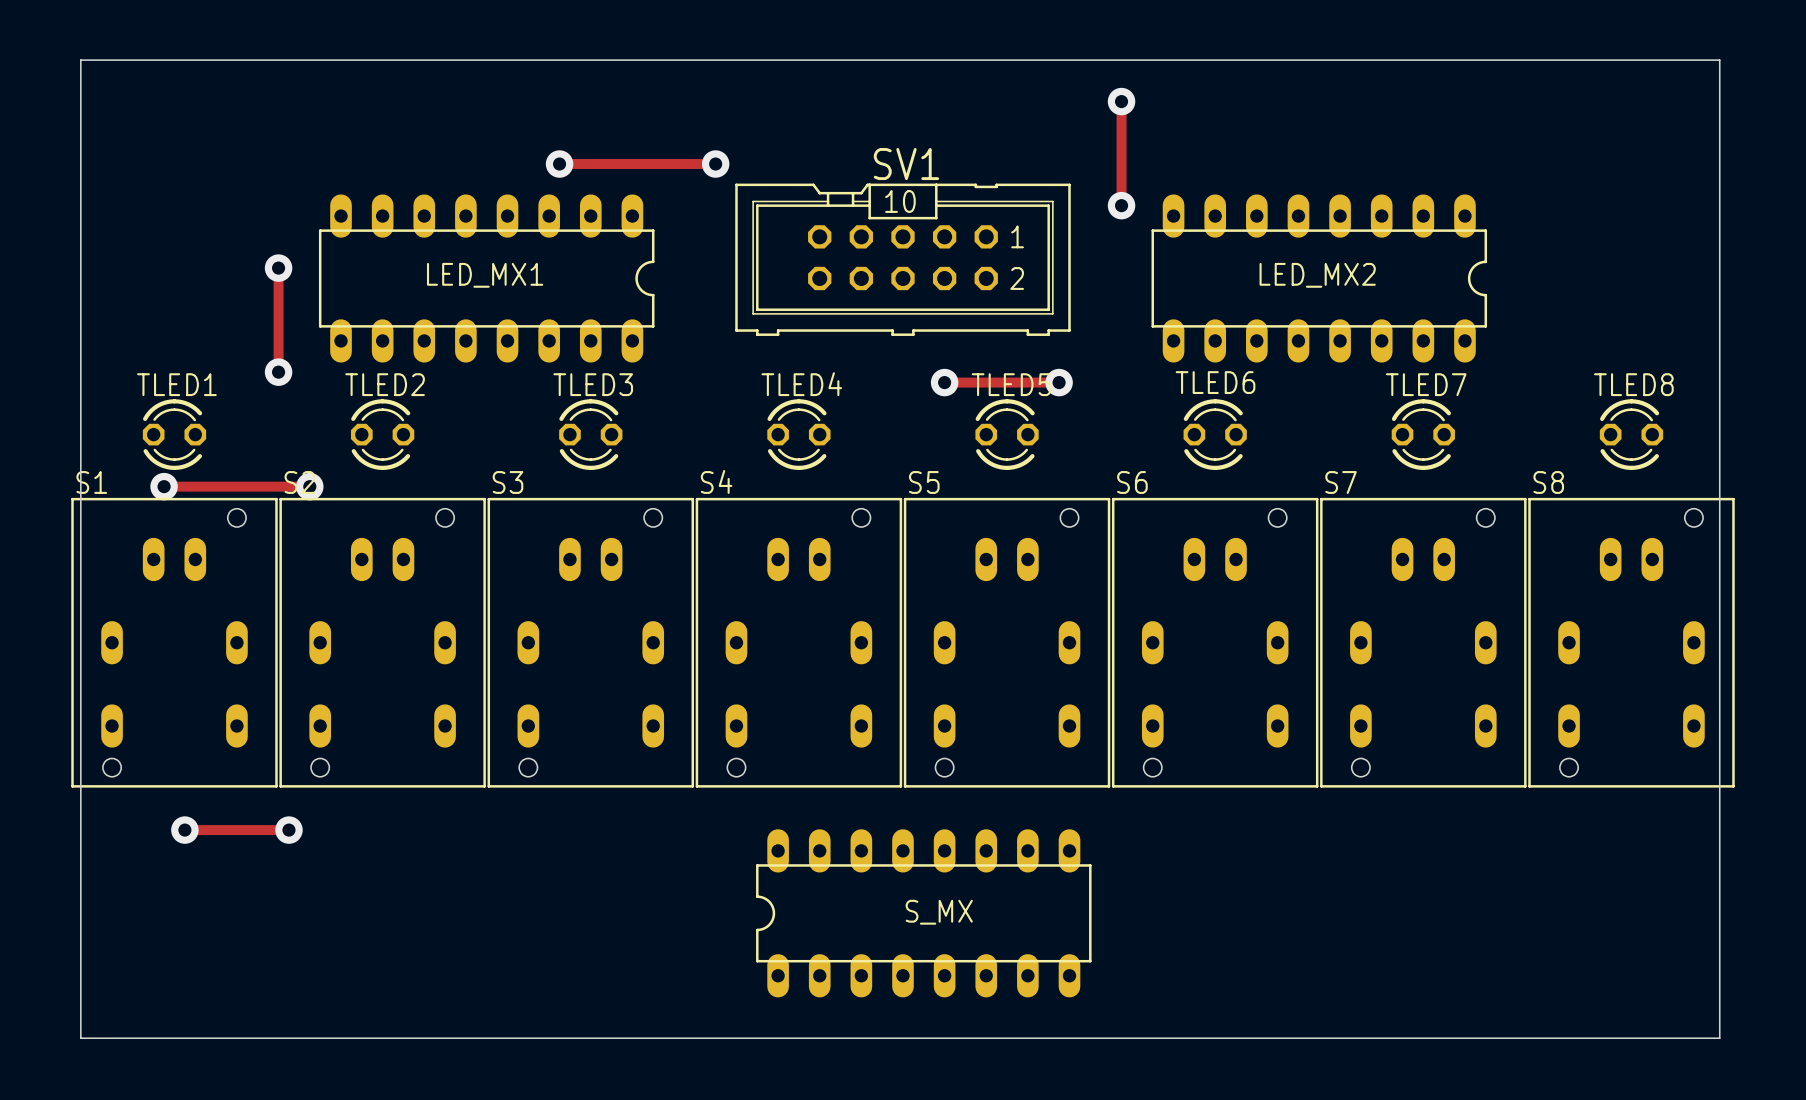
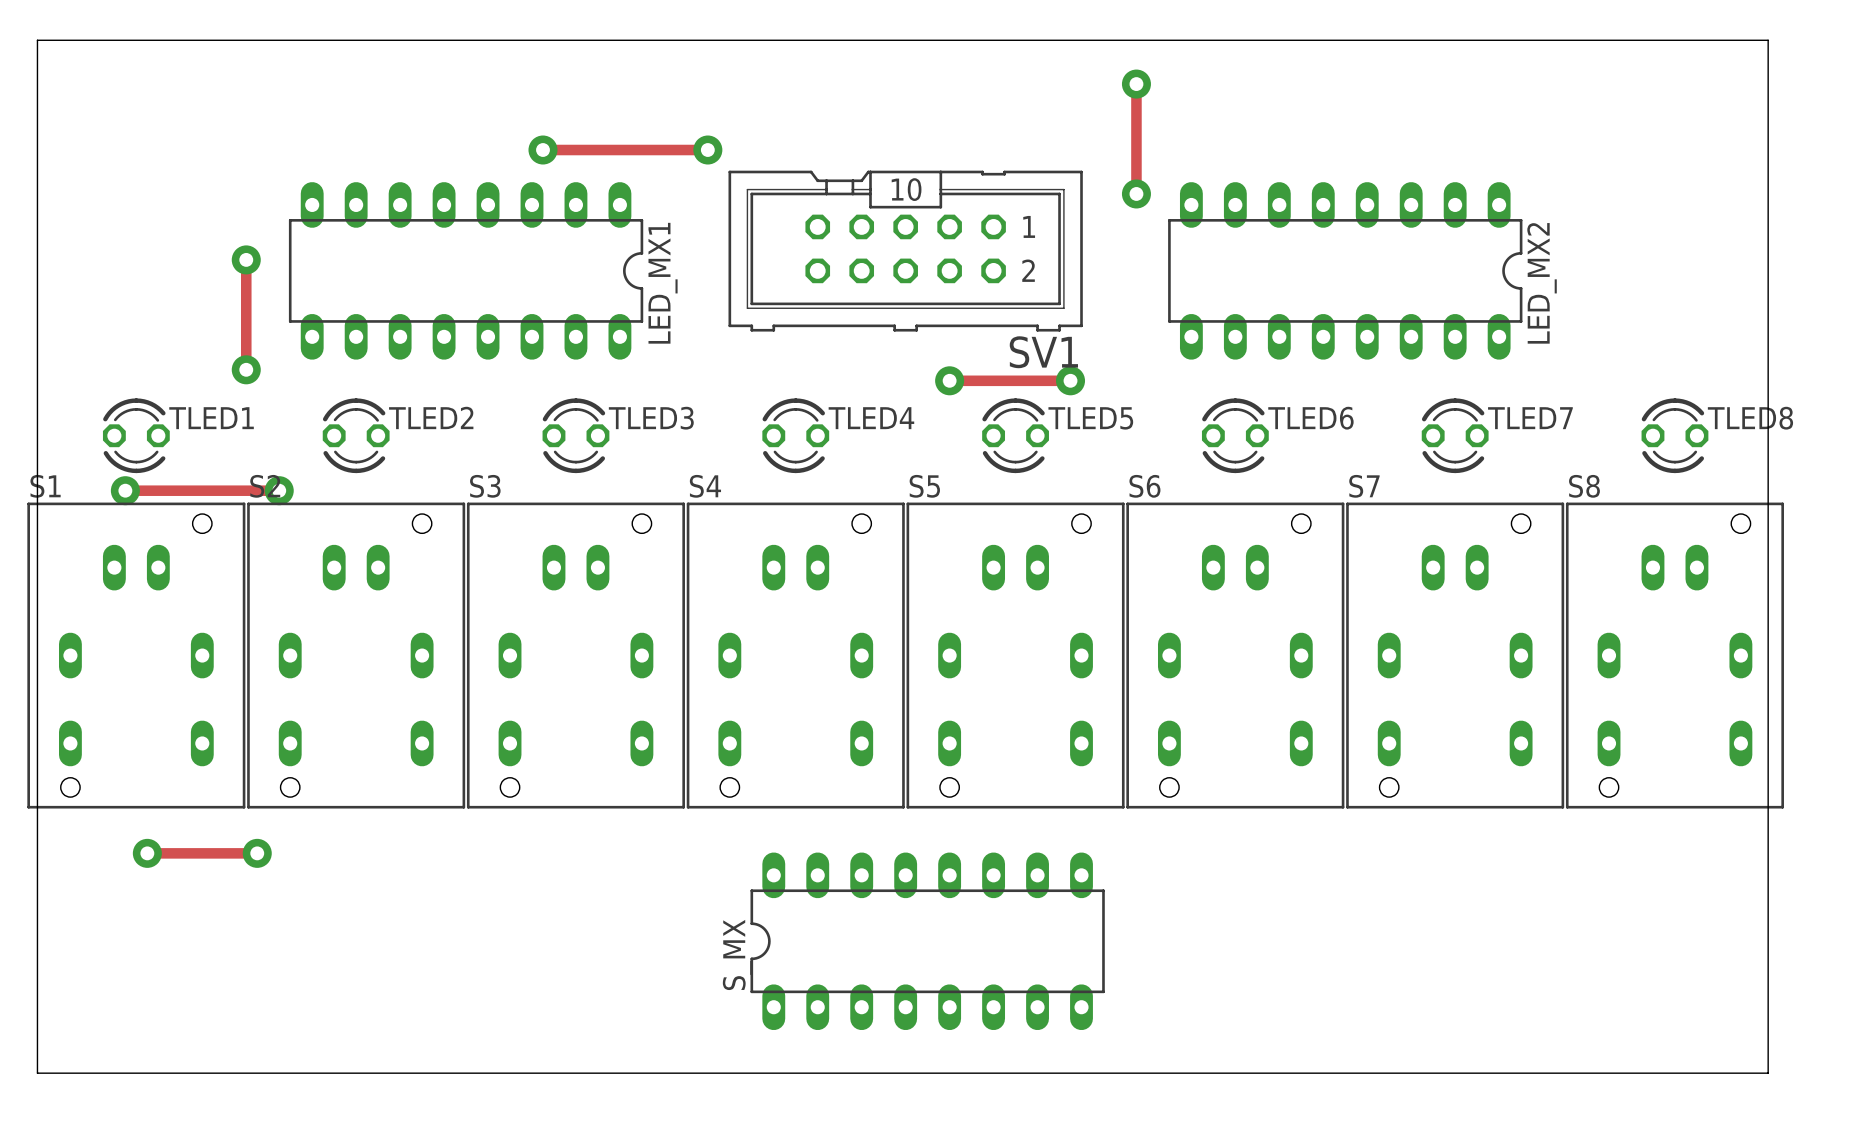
SV1 name position: SV1 (906, 164) -> SV1 (1043, 352)
LED_MX1 name rotation: 0° (485, 275) -> 90° counterclockwise (663, 283)
LED_MX1 name position: LED_MX1 (485, 275) -> LED_MX1 (663, 283)
LED_MX2 name rotation: 0° (1317, 275) -> 90° counterclockwise (1542, 283)
LED_MX2 name position: LED_MX2 (1317, 275) -> LED_MX2 (1542, 283)
TLED6 name position: TLED6 (1215, 382) -> TLED6 (1310, 418)
TLED1 name position: TLED1 (176, 384) -> TLED1 (211, 418)
TLED2 name position: TLED2 (385, 384) -> TLED2 (431, 417)
TLED3 name position: TLED3 (593, 384) -> TLED3 (651, 418)
TLED4 name position: TLED4 (801, 384) -> TLED4 (871, 418)
TLED5 name position: TLED5 (1011, 384) -> TLED5 (1090, 418)
TLED7 name position: TLED7 (1426, 384) -> TLED7 (1530, 418)
TLED8 name position: TLED8 (1633, 384) -> TLED8 (1750, 418)
S_MX name rotation: 0° (939, 912) -> 90° counterclockwise (737, 954)
S_MX name position: S_MX (939, 912) -> S_MX (737, 954)

